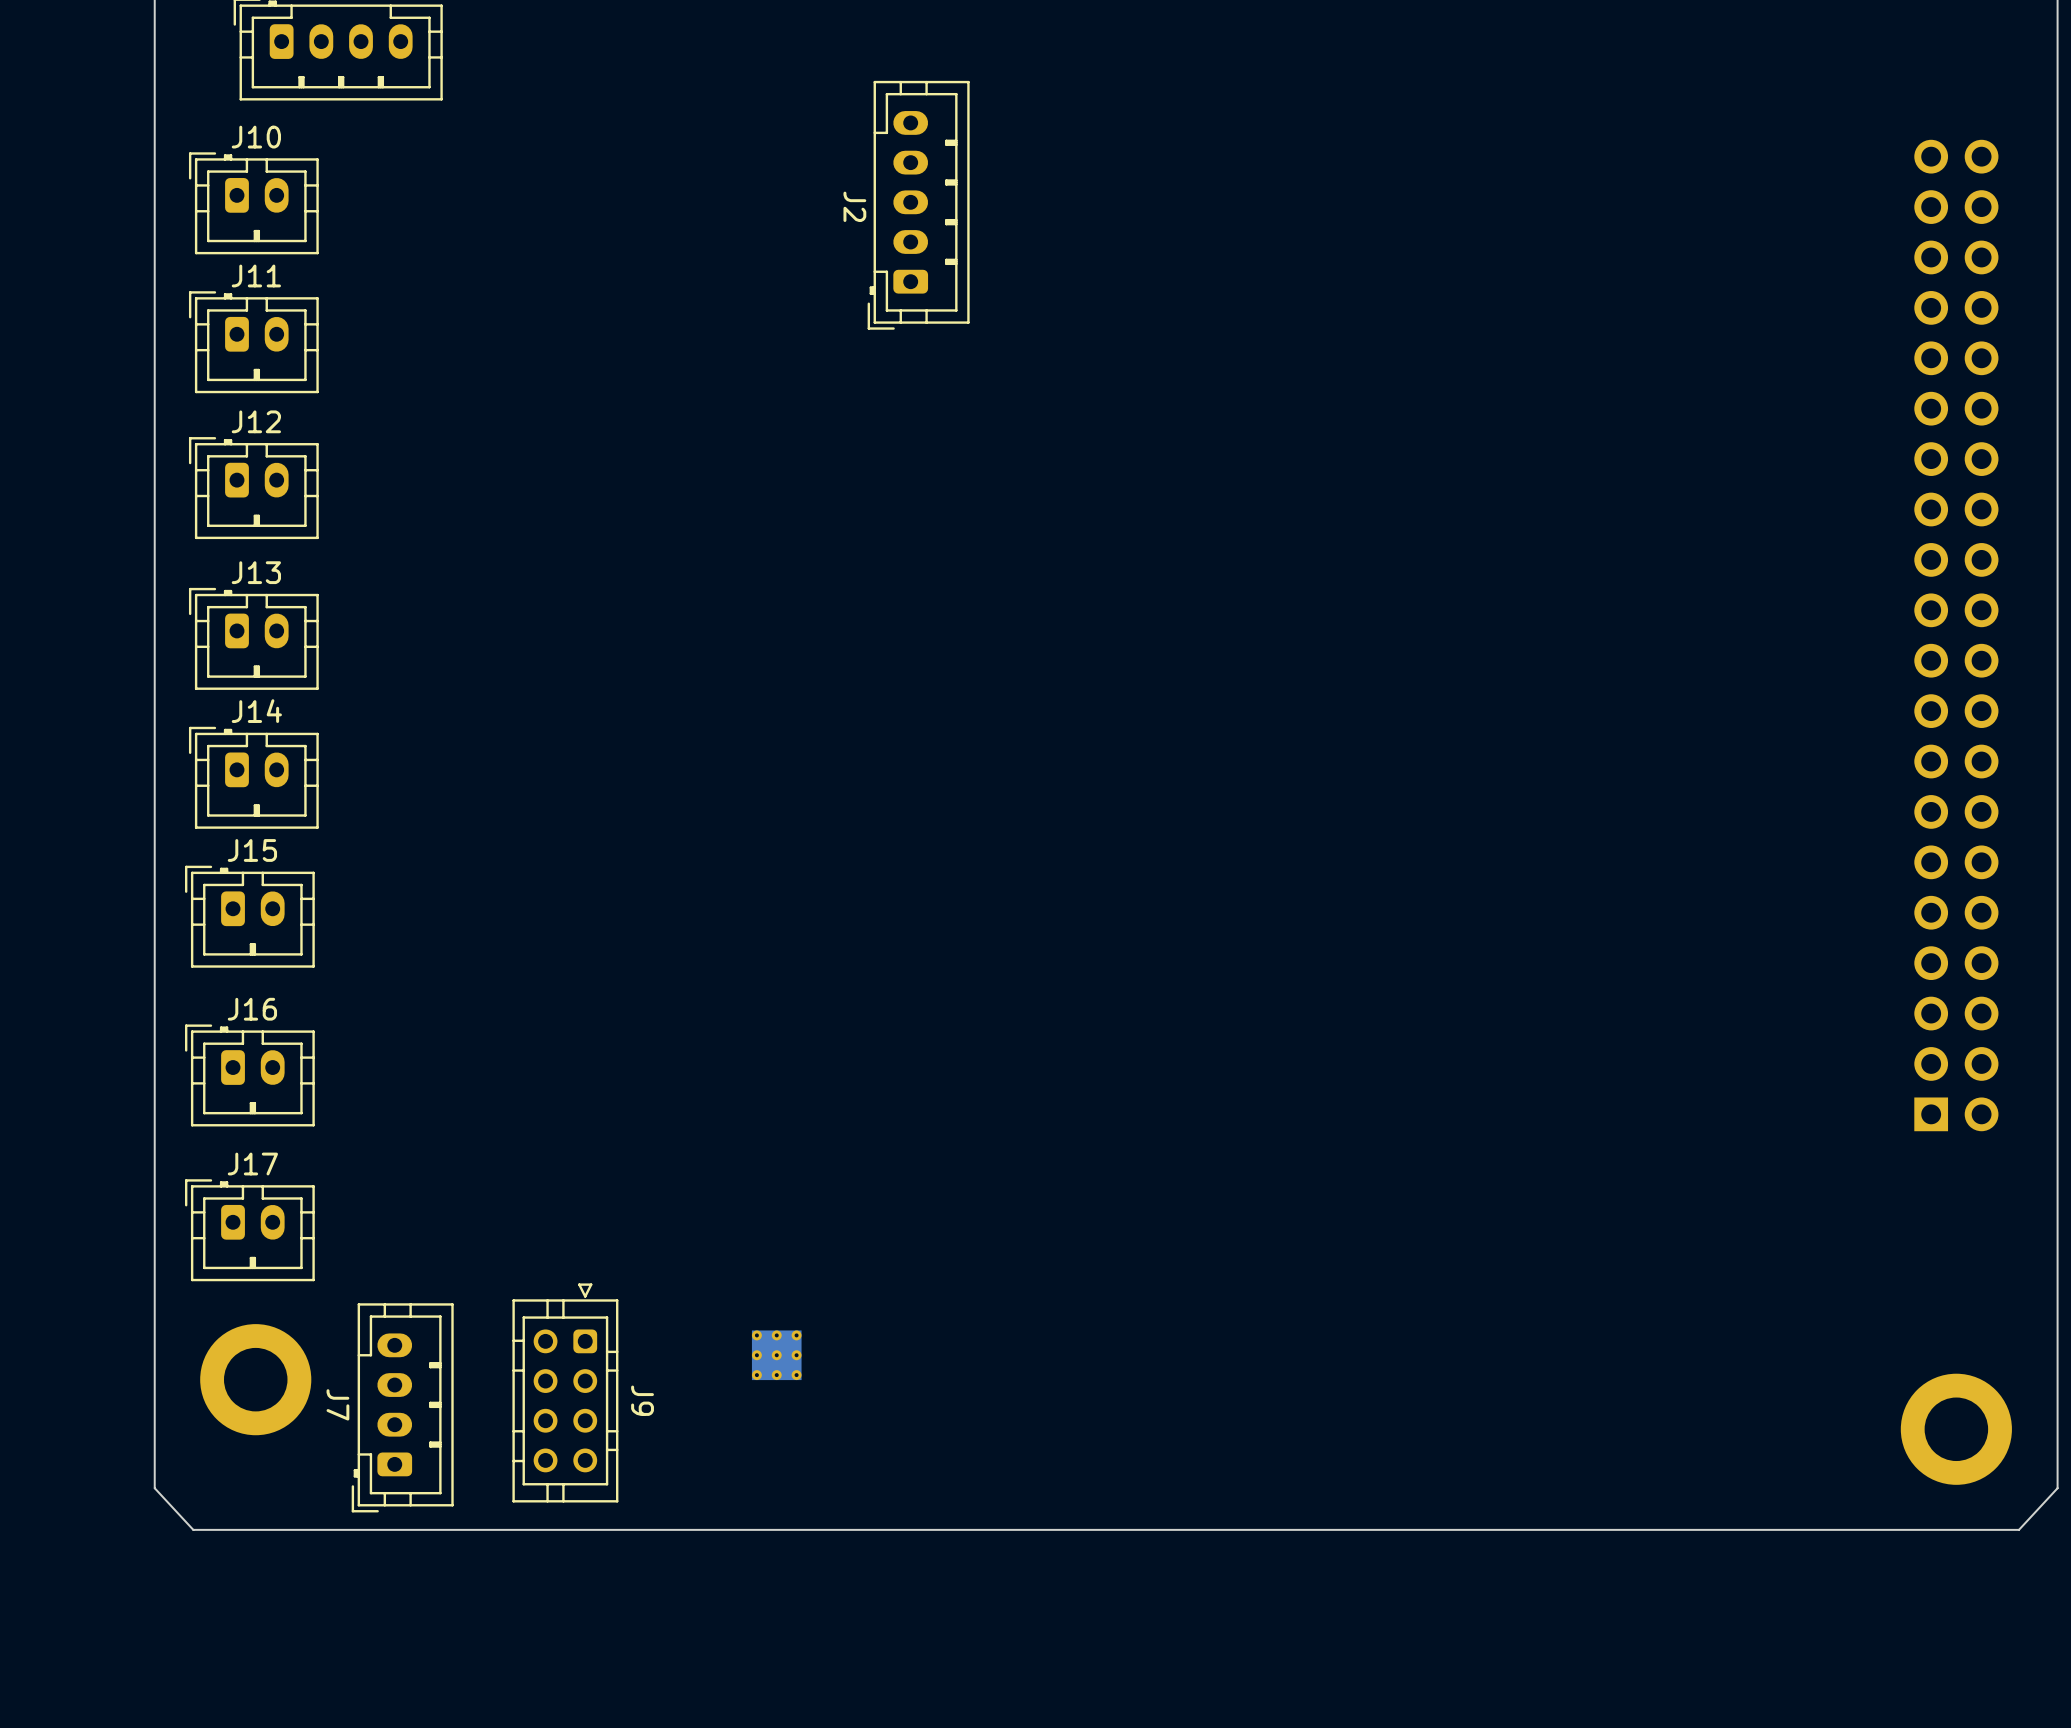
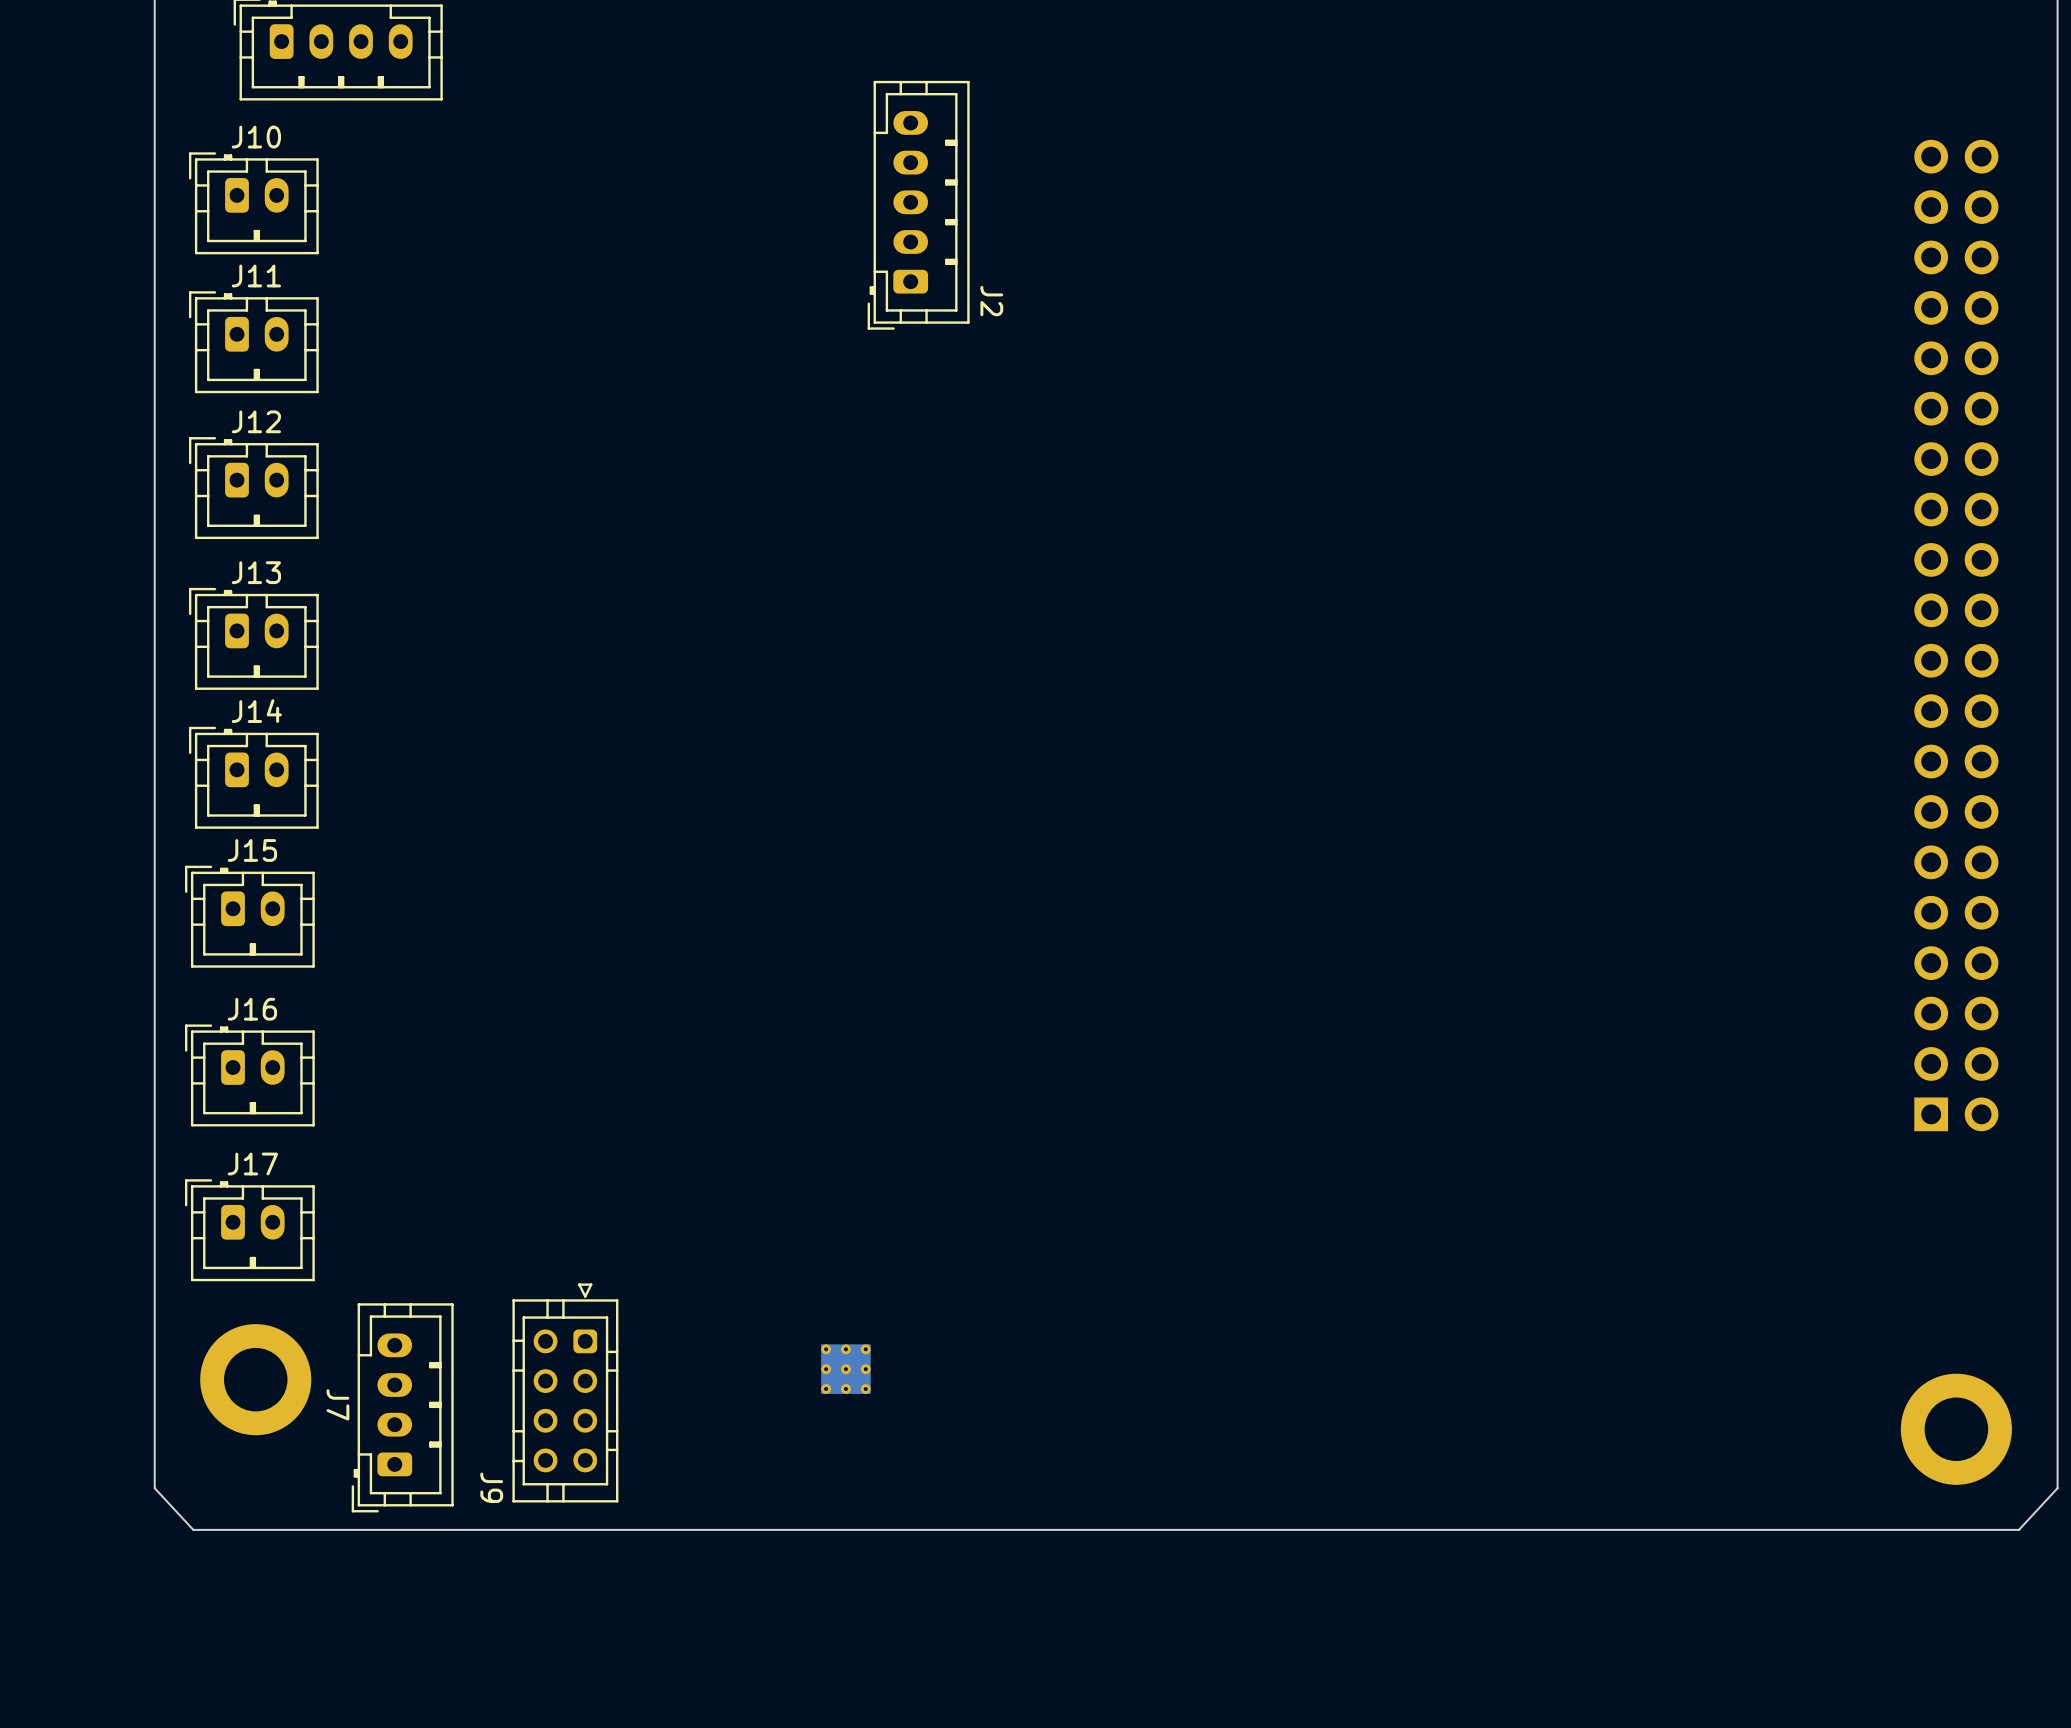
J2 name position: J2 (854, 206) -> J2 (991, 301)
part position: (776, 1355) -> (845, 1369)
J9 name position: J9 (642, 1400) -> J9 (491, 1487)

